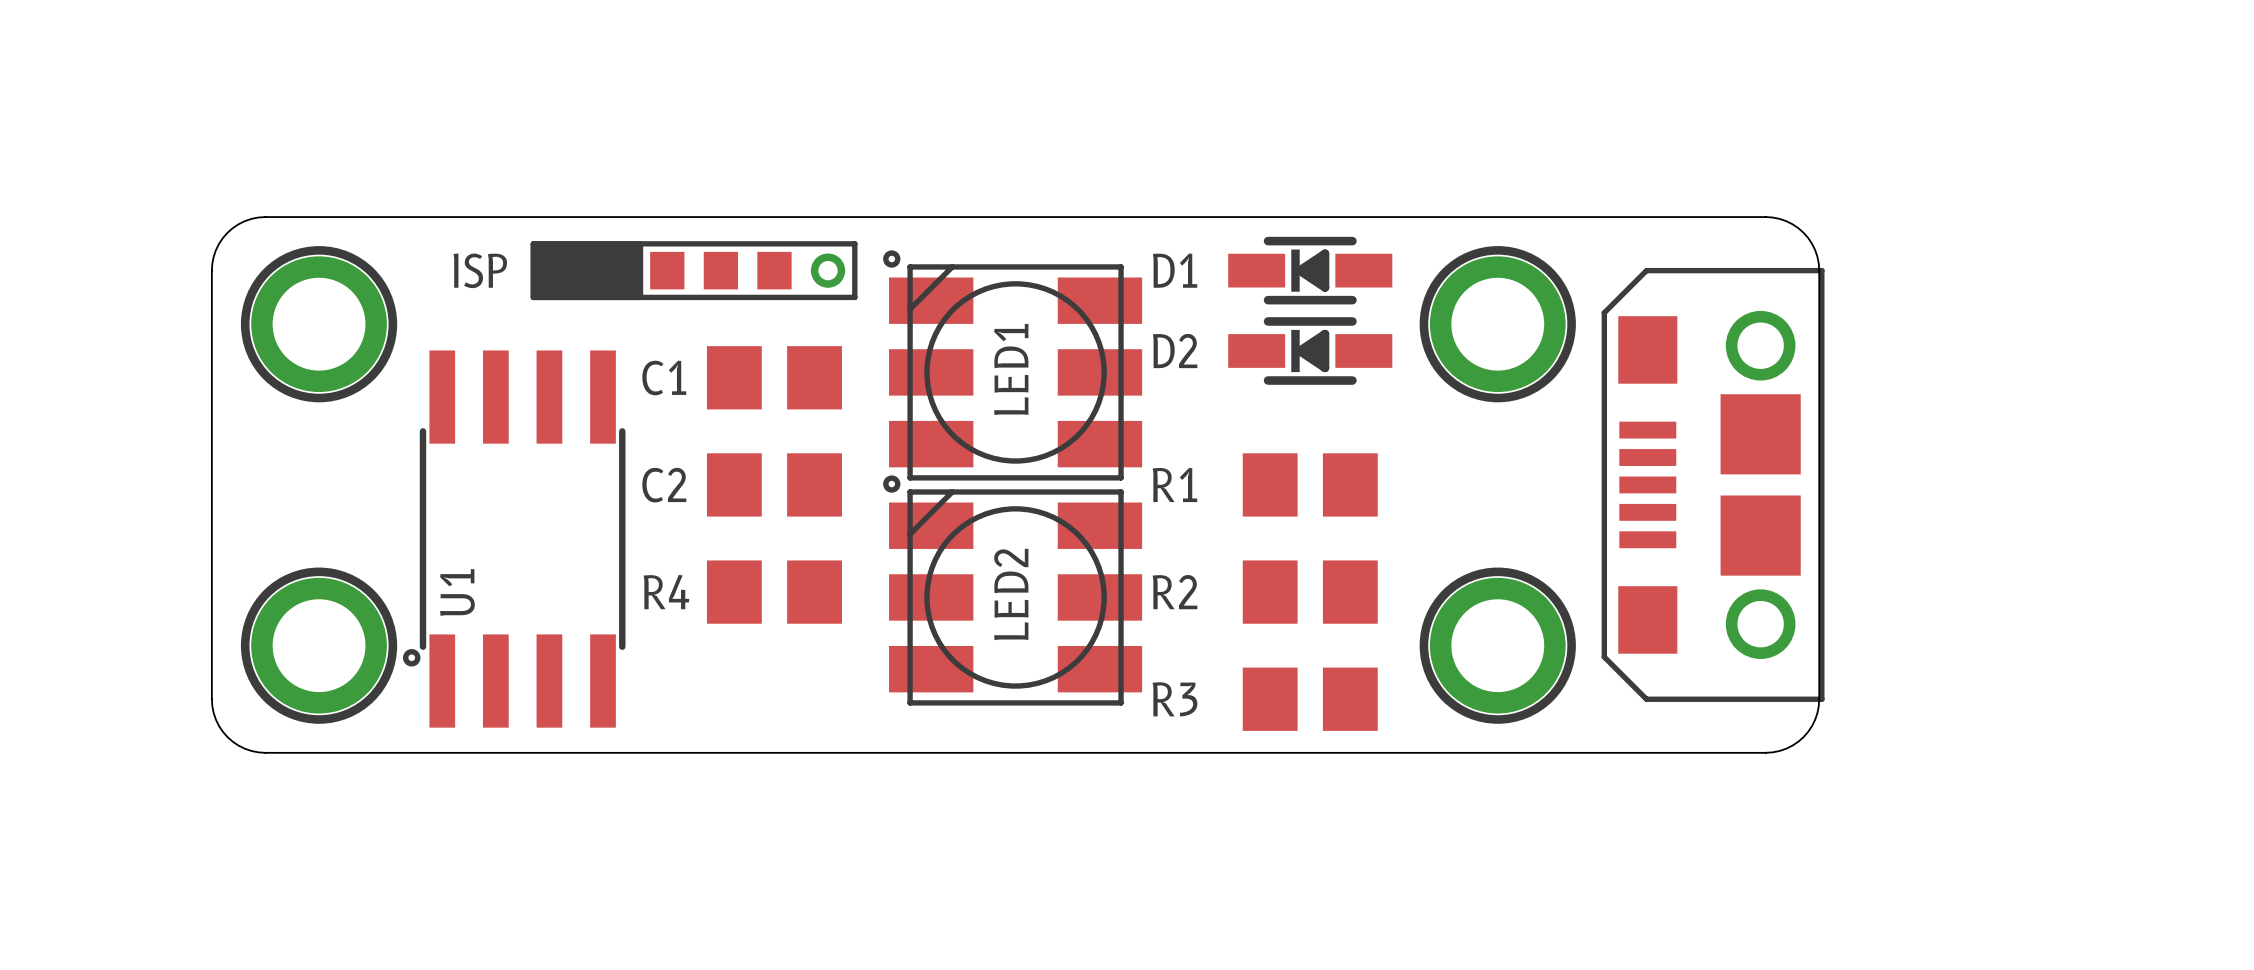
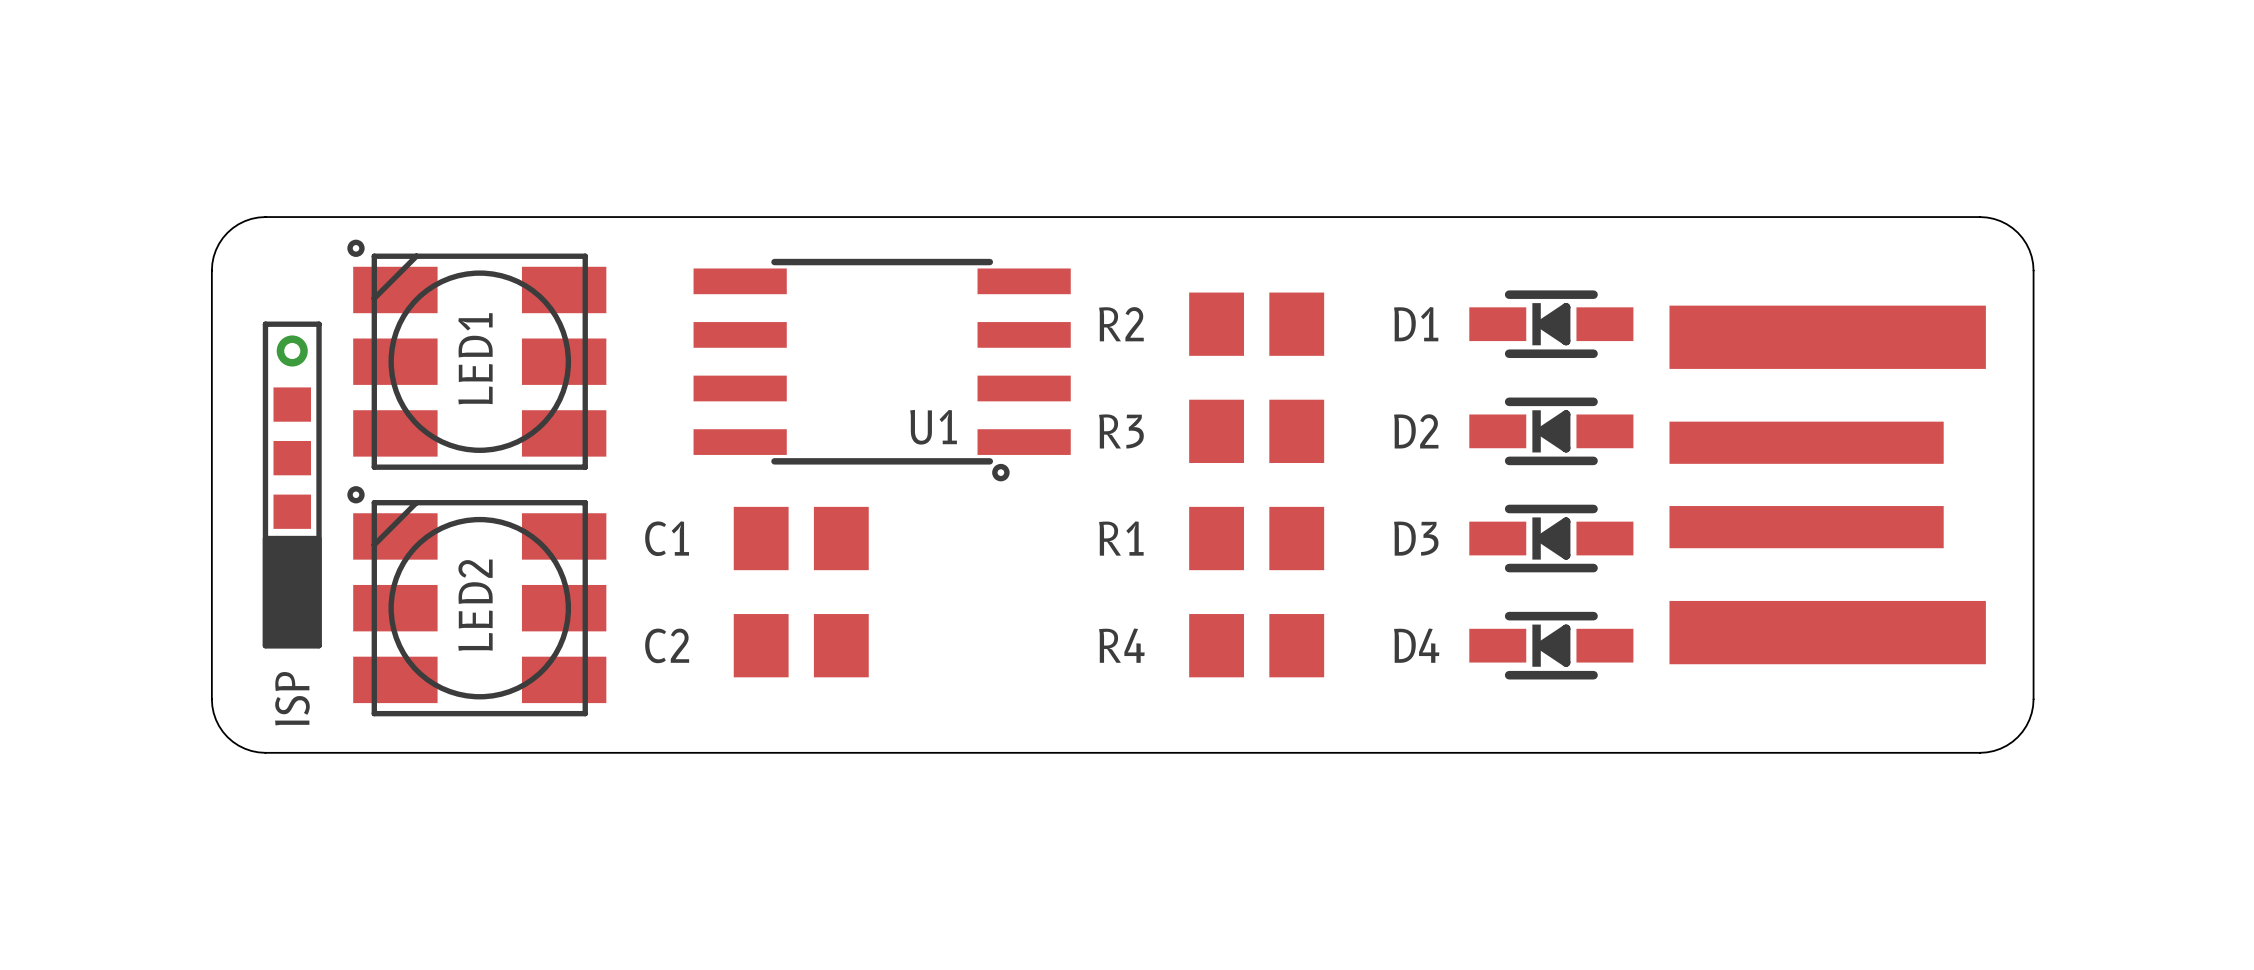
board edge: (1765, 217) (1786, 221) (1803, 232) (1815, 250) (1819, 270) (1818, 706) (1812, 726) (1798, 741) (1779, 751) (1765, 752) -> (1765, 217) (1979, 217) (1993, 218) (2006, 224) (2022, 238) (2031, 256) (2033, 270) (2033, 699) (2031, 713) (2026, 726) (2017, 737) (2006, 745) (1986, 752) (1765, 752)
ISP: (694, 270) -> none
D1 position: (1310, 270) -> (1551, 324)
part: (319, 324) -> none
part: (1497, 324) -> none
D2 position: (1310, 350) -> (1551, 431)
LED1 position: (1012, 365) -> (476, 354)
C1 name position: C1 (664, 377) -> C1 (667, 538)
C1 position: (774, 377) -> (801, 538)
ISP: none -> (292, 484)
C2 position: (774, 484) -> (801, 645)
R1 position: (1310, 484) -> (1256, 538)
part: (1713, 484) -> none
part: none -> (1827, 484)
C2 name position: C2 (664, 485) -> C2 (667, 645)
D3: none -> (1551, 538)
U1 rotation: 0° (514, 539) -> 90° counterclockwise (882, 370)
U1 position: (514, 539) -> (882, 370)
LED2 position: (1012, 590) -> (476, 601)
R4 name position: R4 (666, 592) -> R4 (1121, 645)
R4 position: (774, 592) -> (1256, 645)
R2 position: (1310, 592) -> (1256, 324)
part: (319, 645) -> none
part: (1497, 645) -> none
D4: none -> (1551, 645)
R3 position: (1310, 699) -> (1256, 431)

